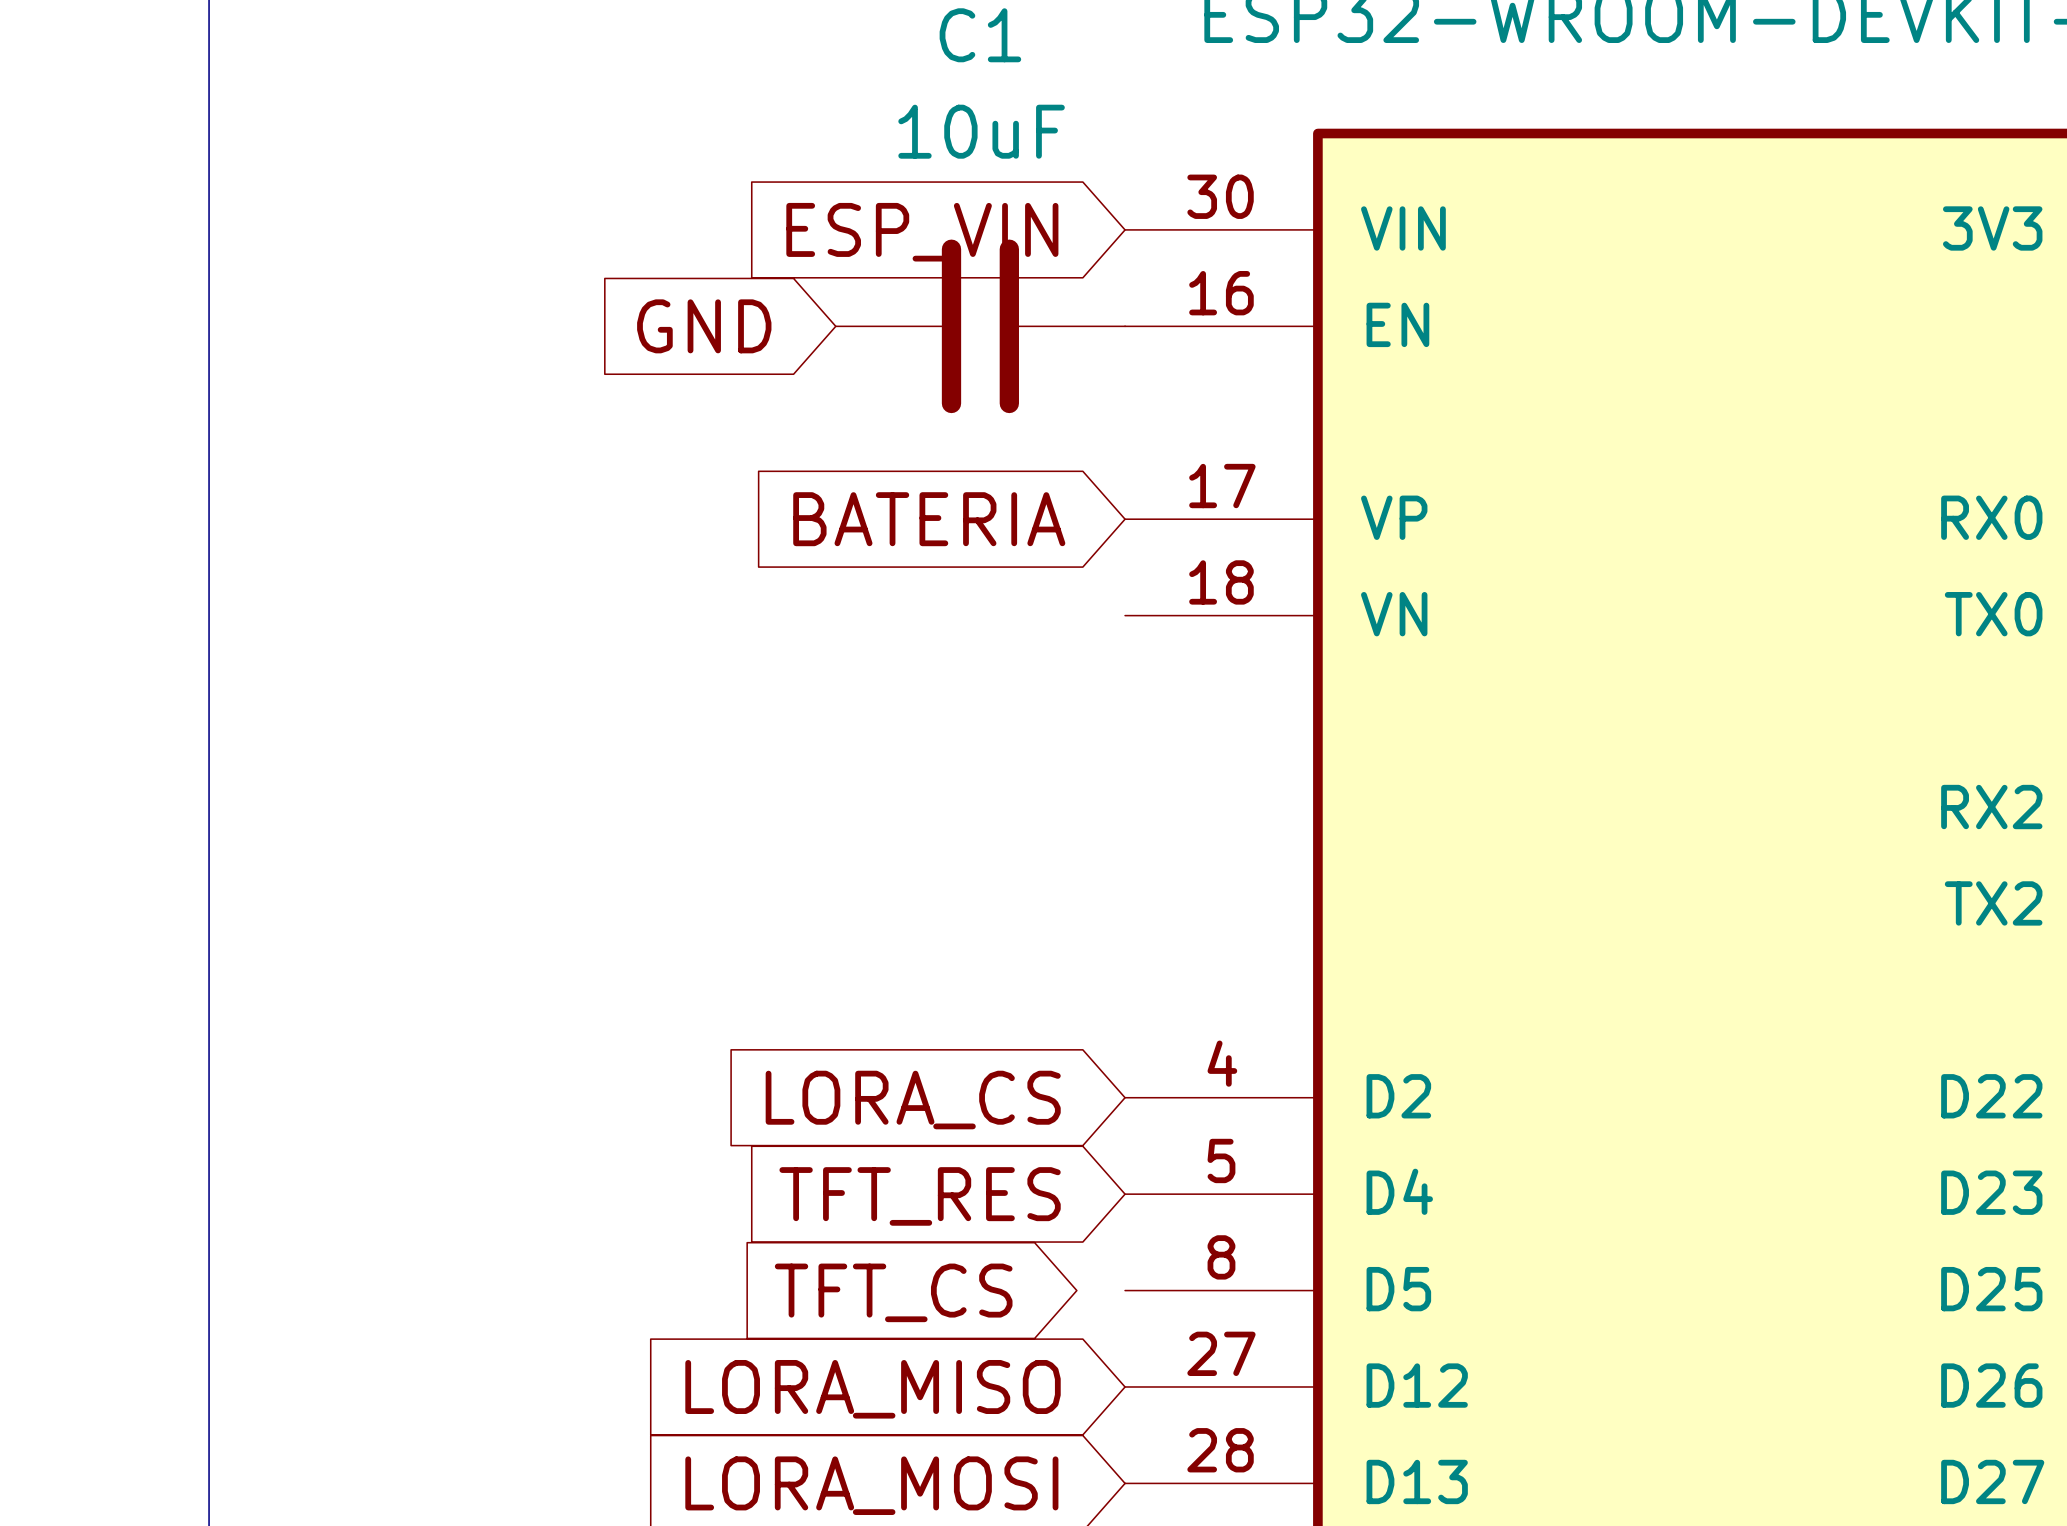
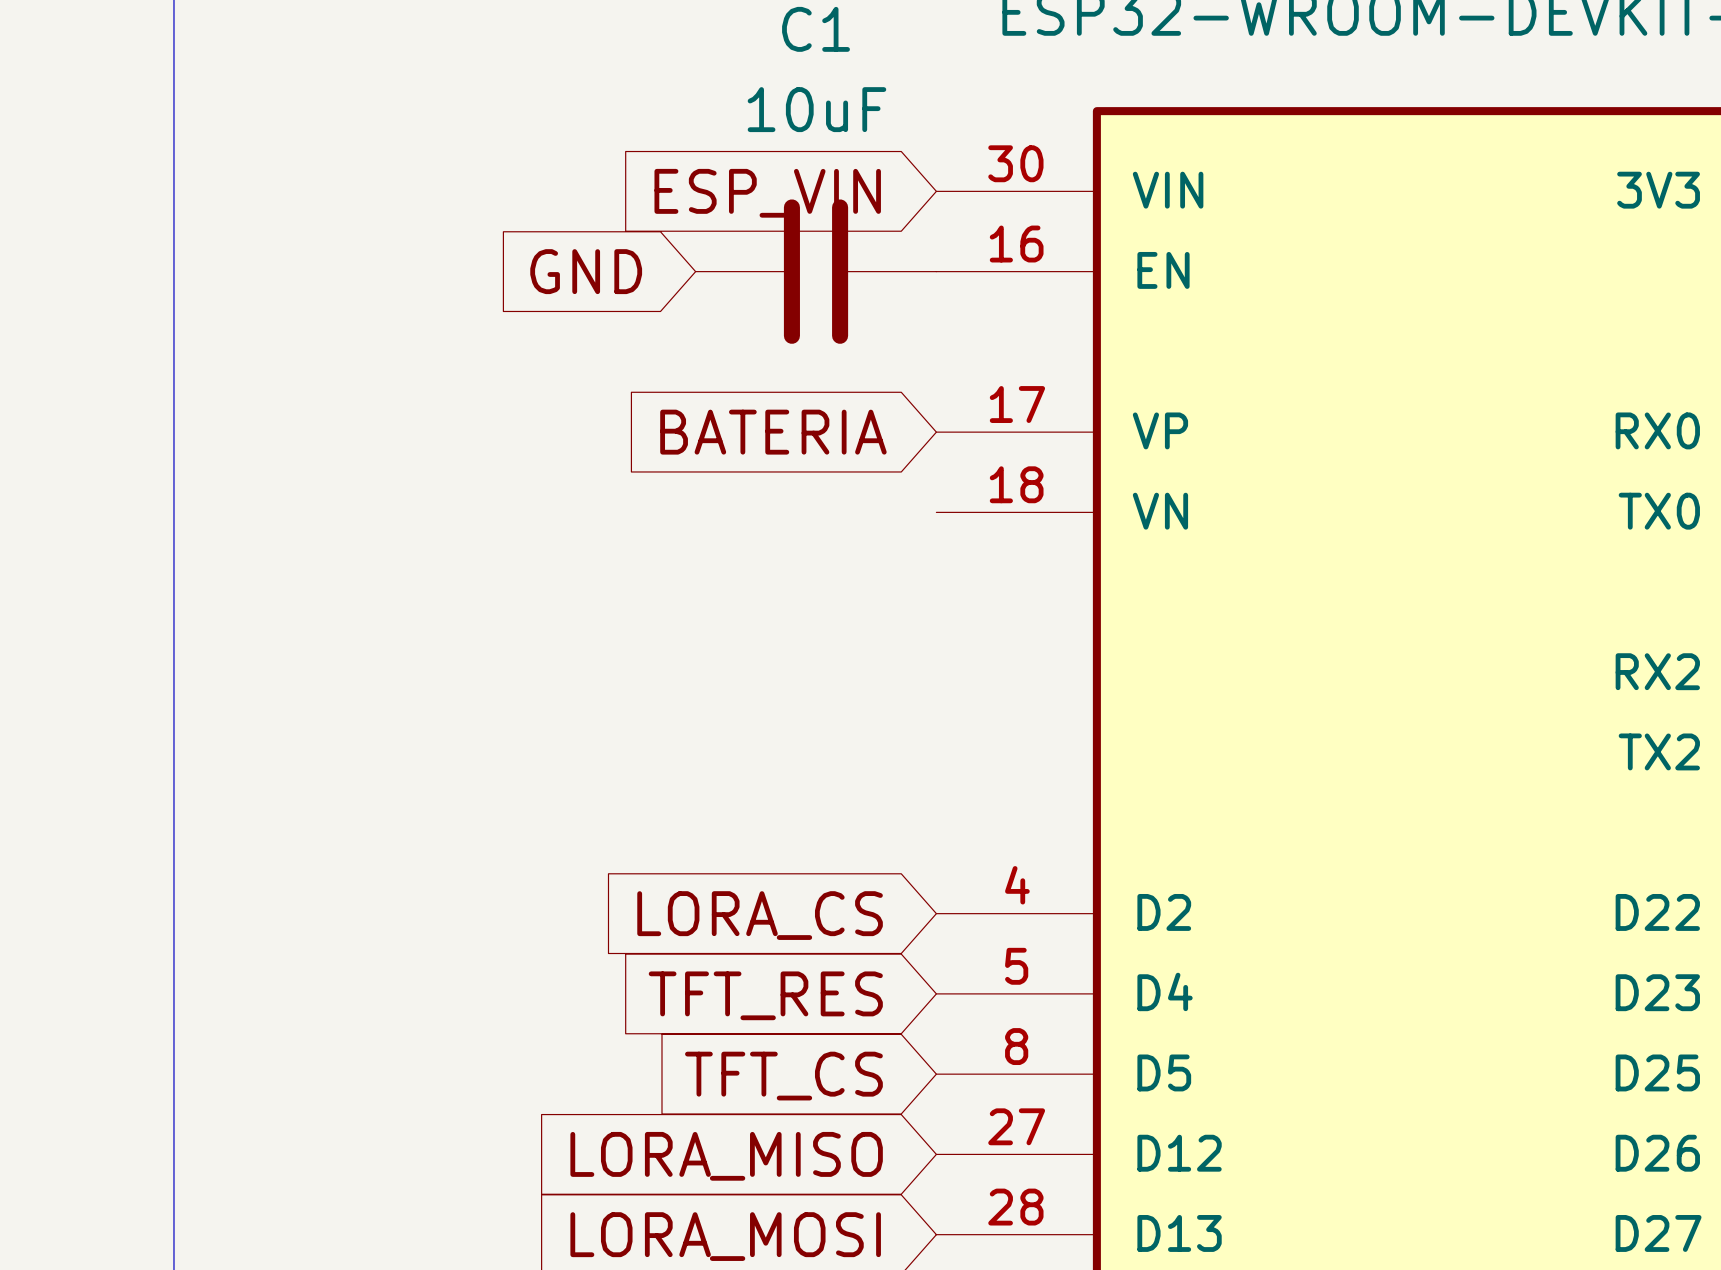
global label position: TFT_CS (893, 1292) -> TFT_CS (783, 1076)

